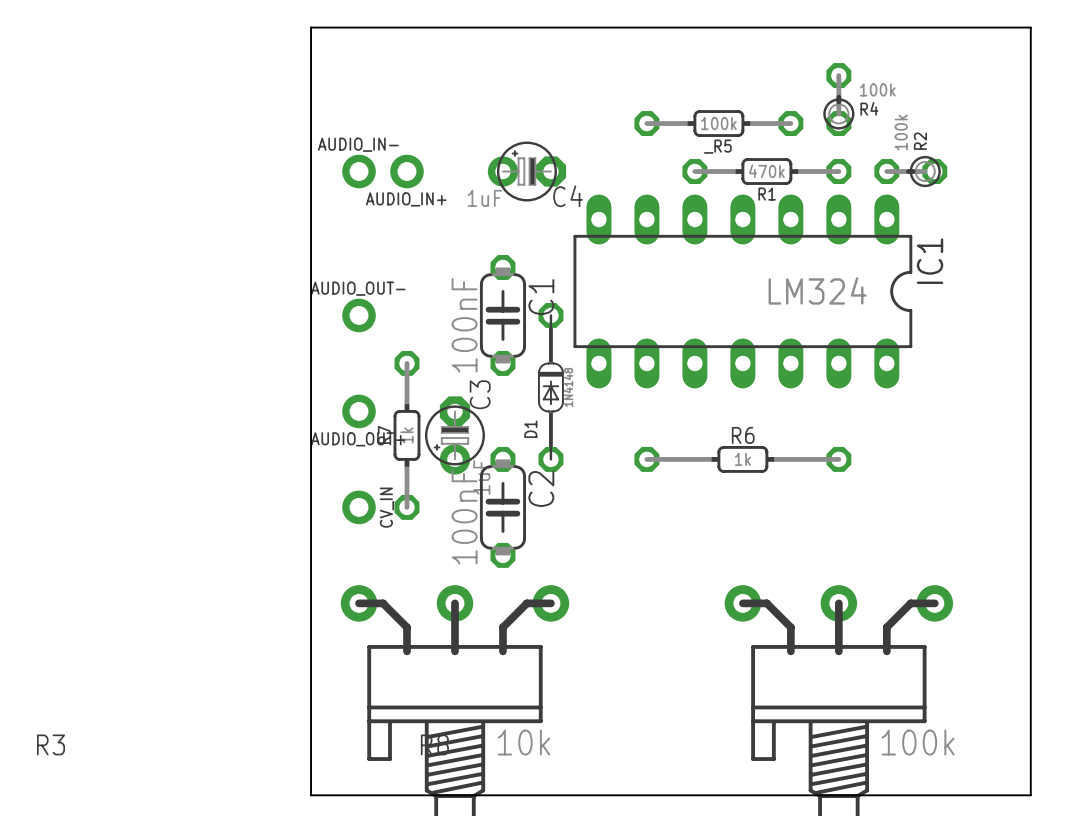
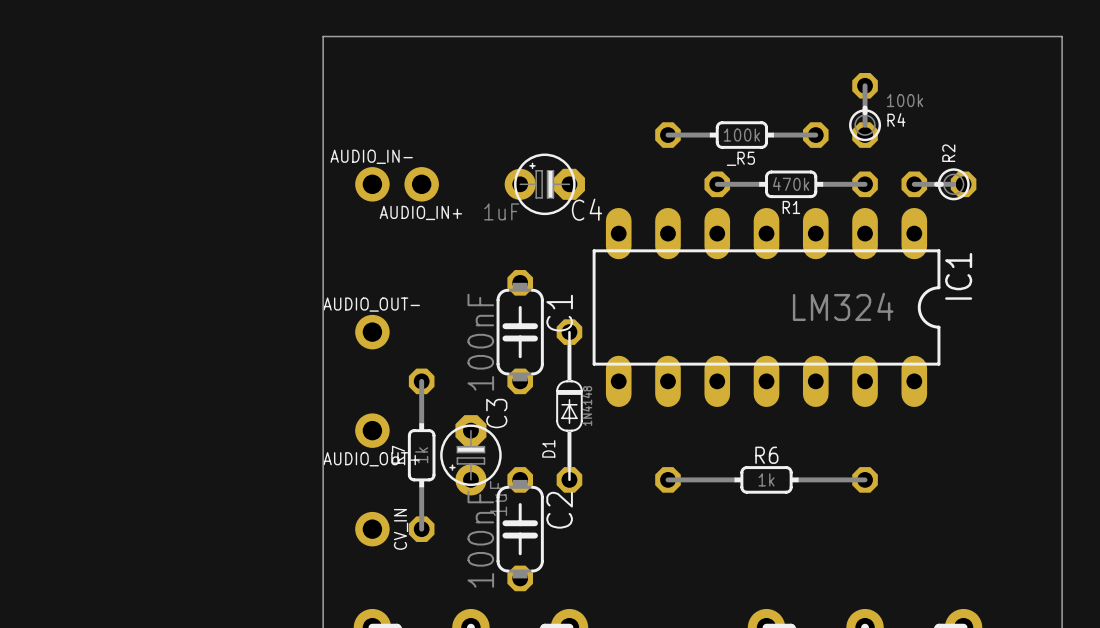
R2 value: 100k (901, 132) -> none

